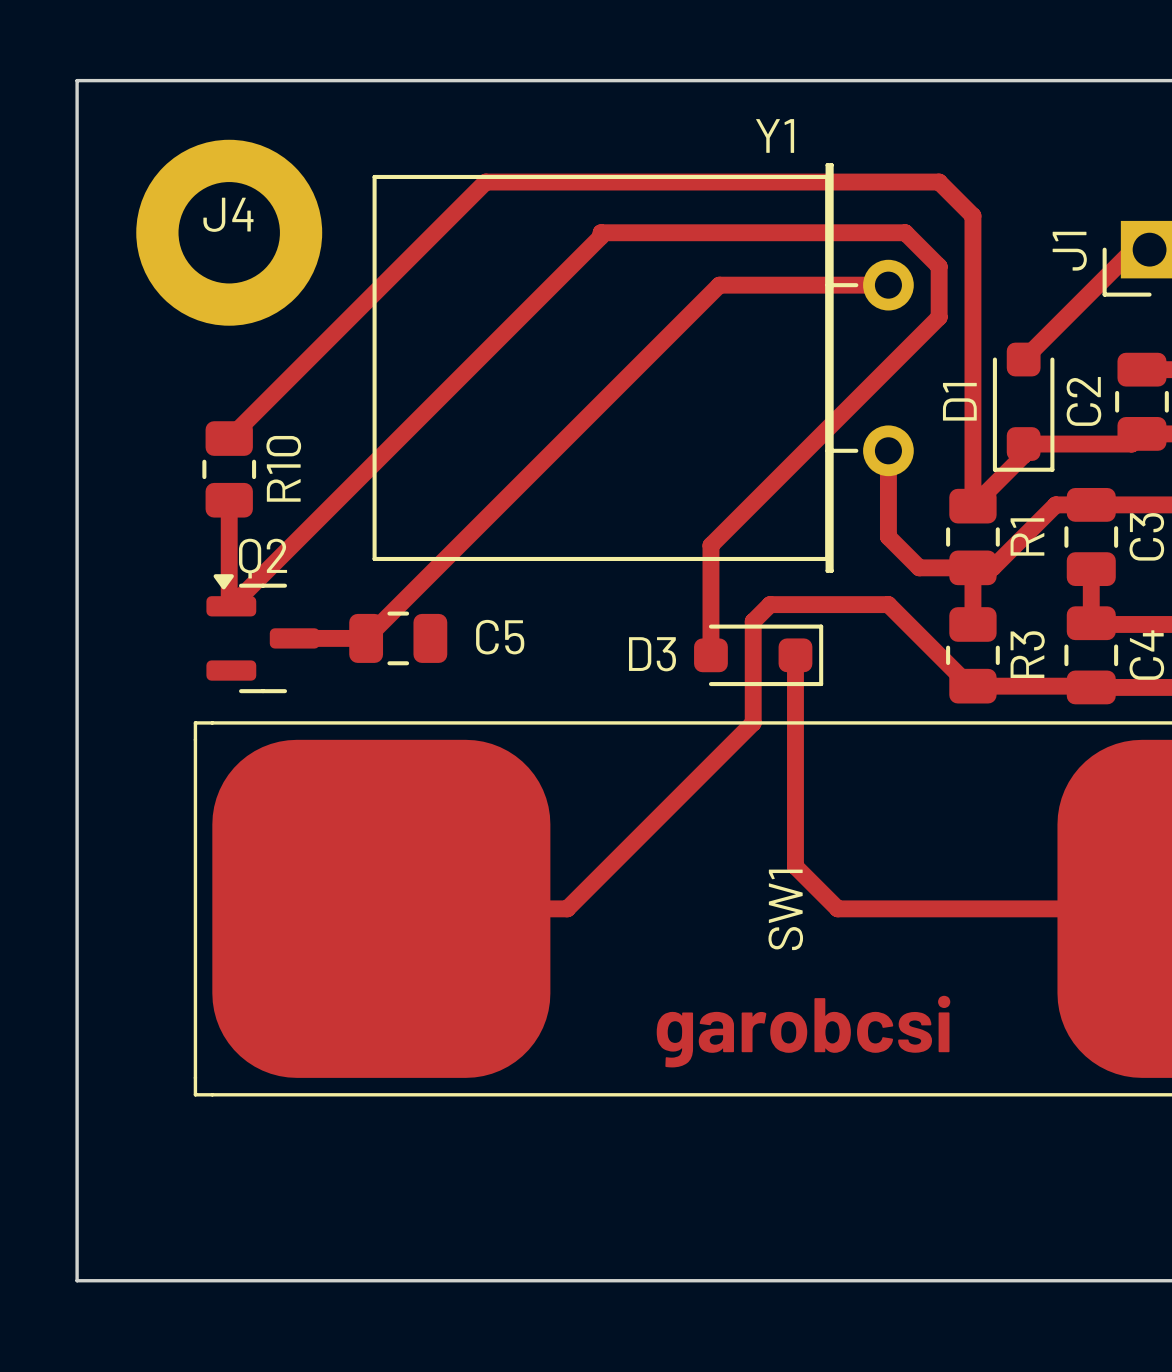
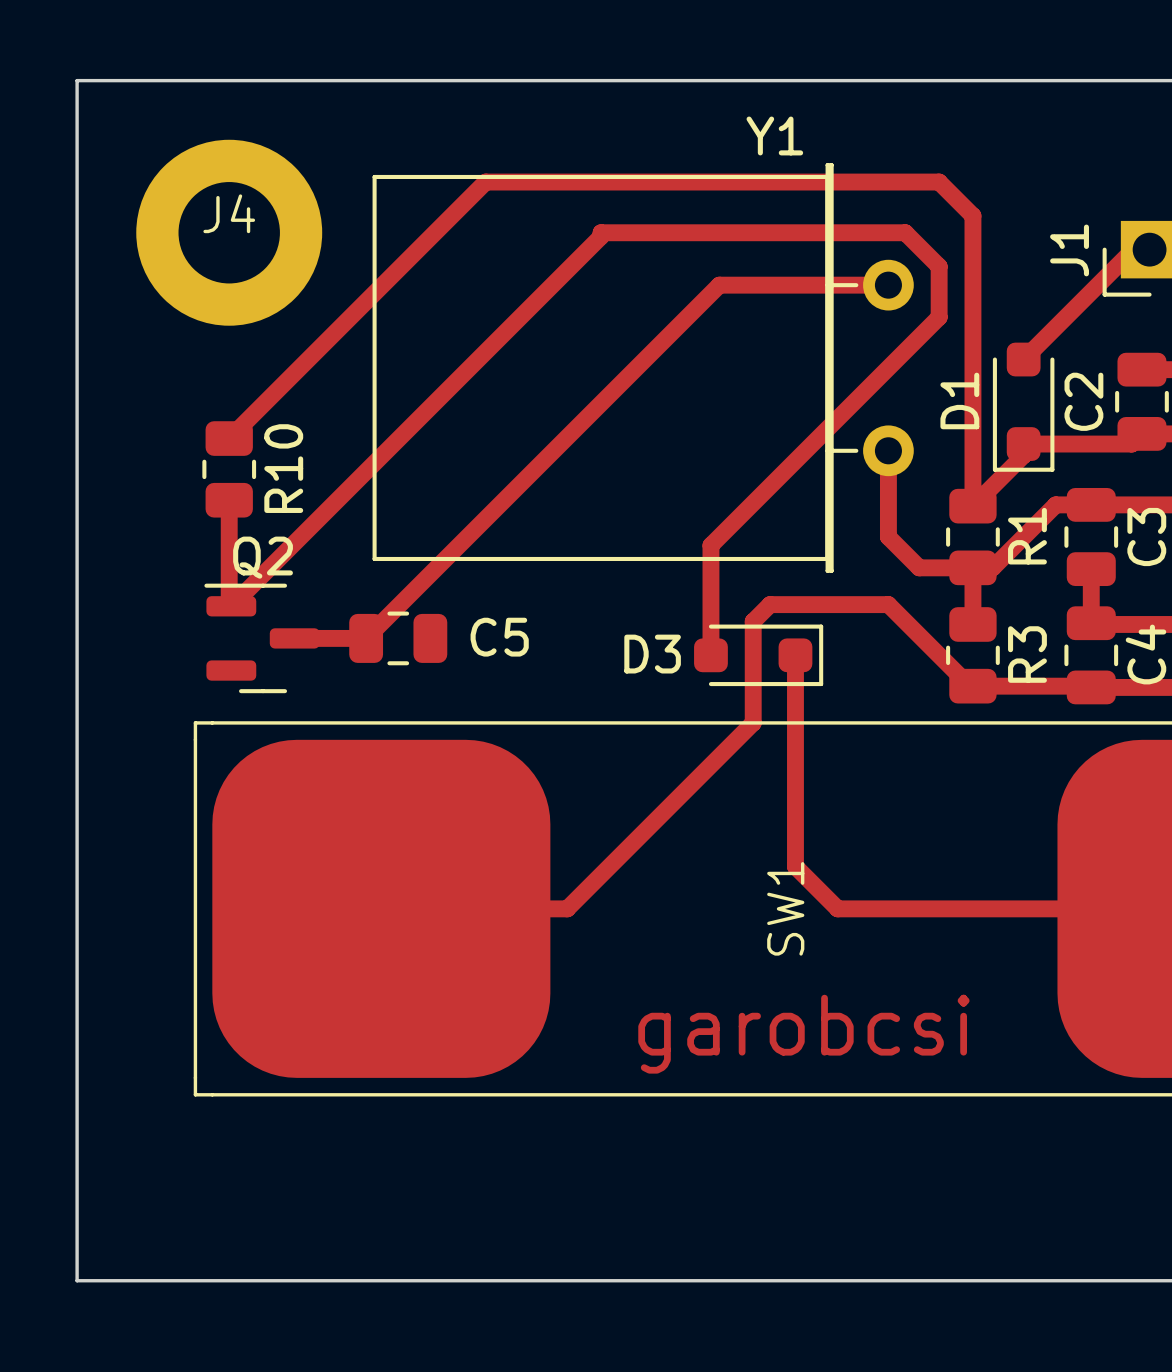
Q2 footprint: [206, 574, 320, 694] -> [204, 583, 320, 694]

